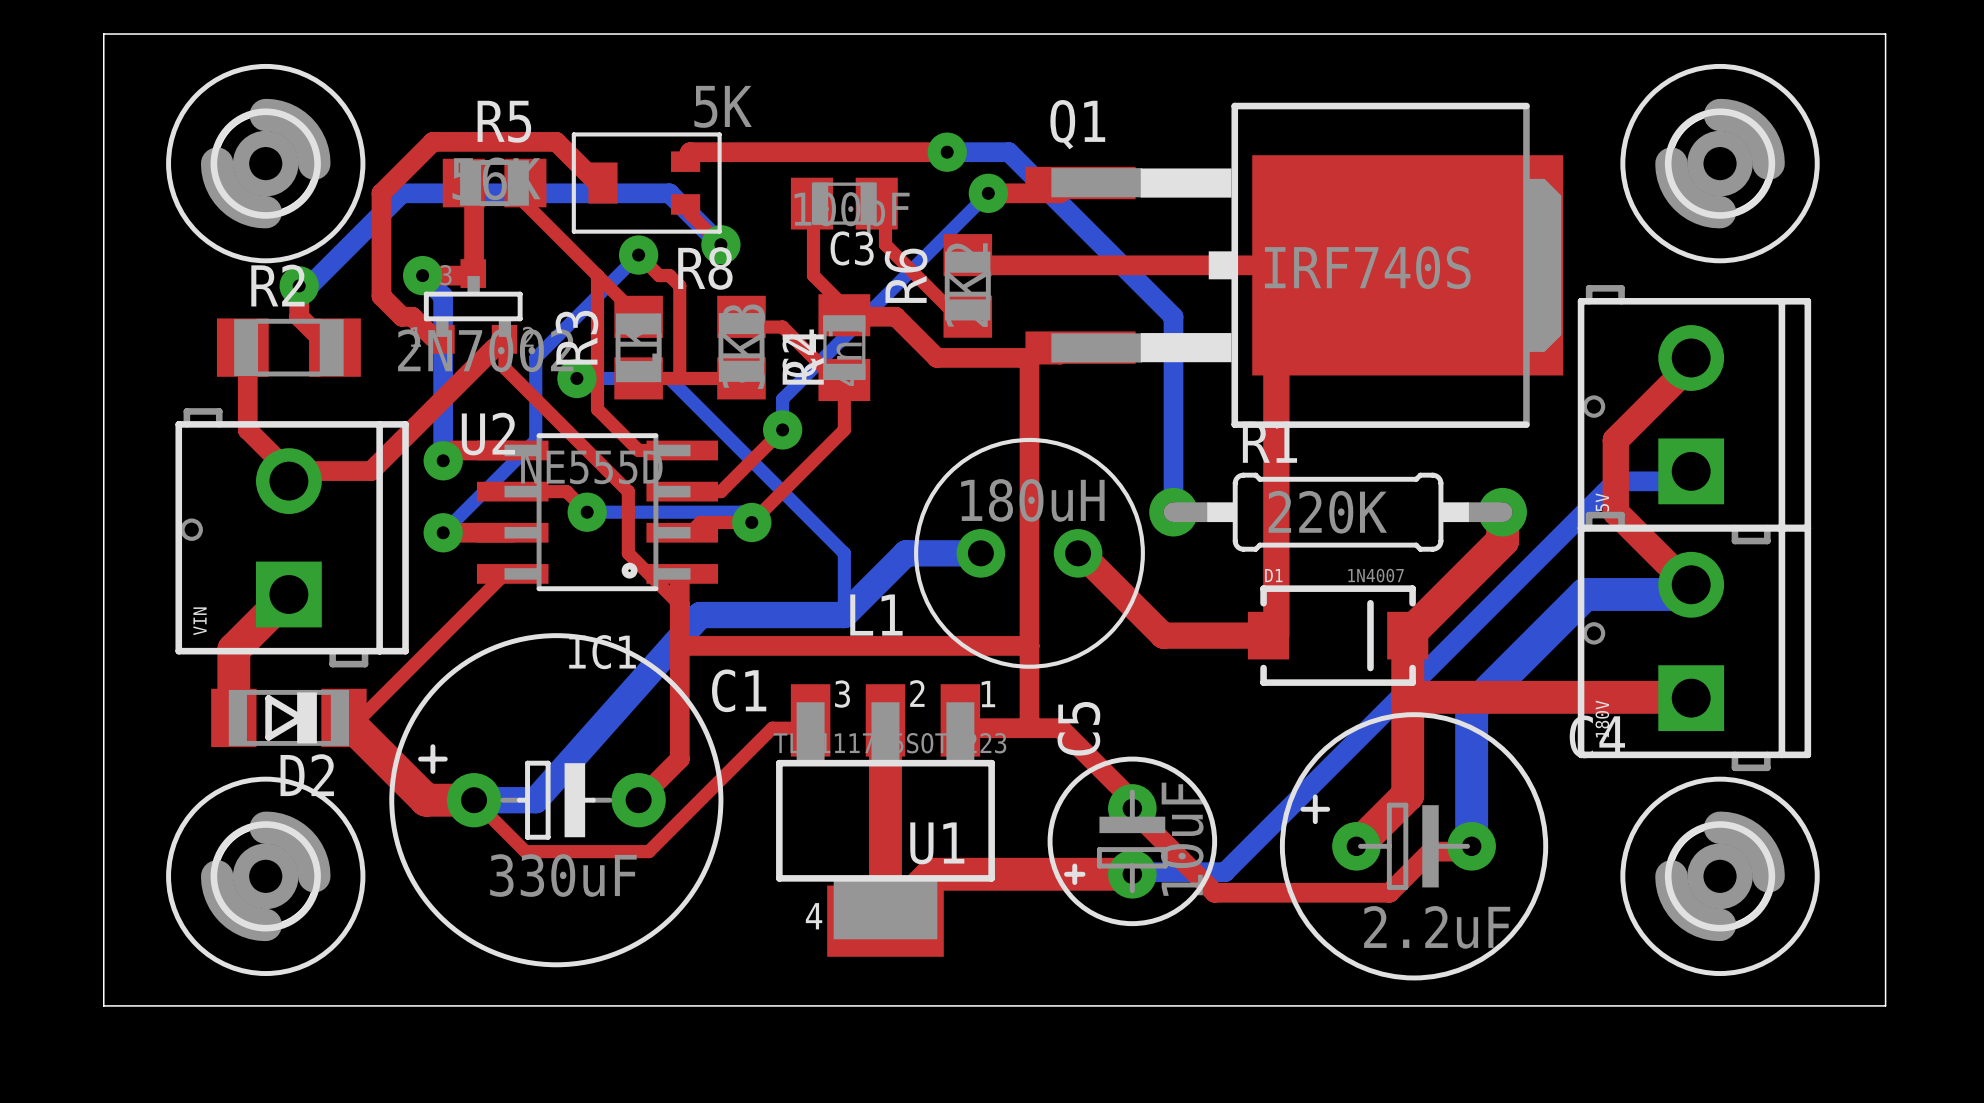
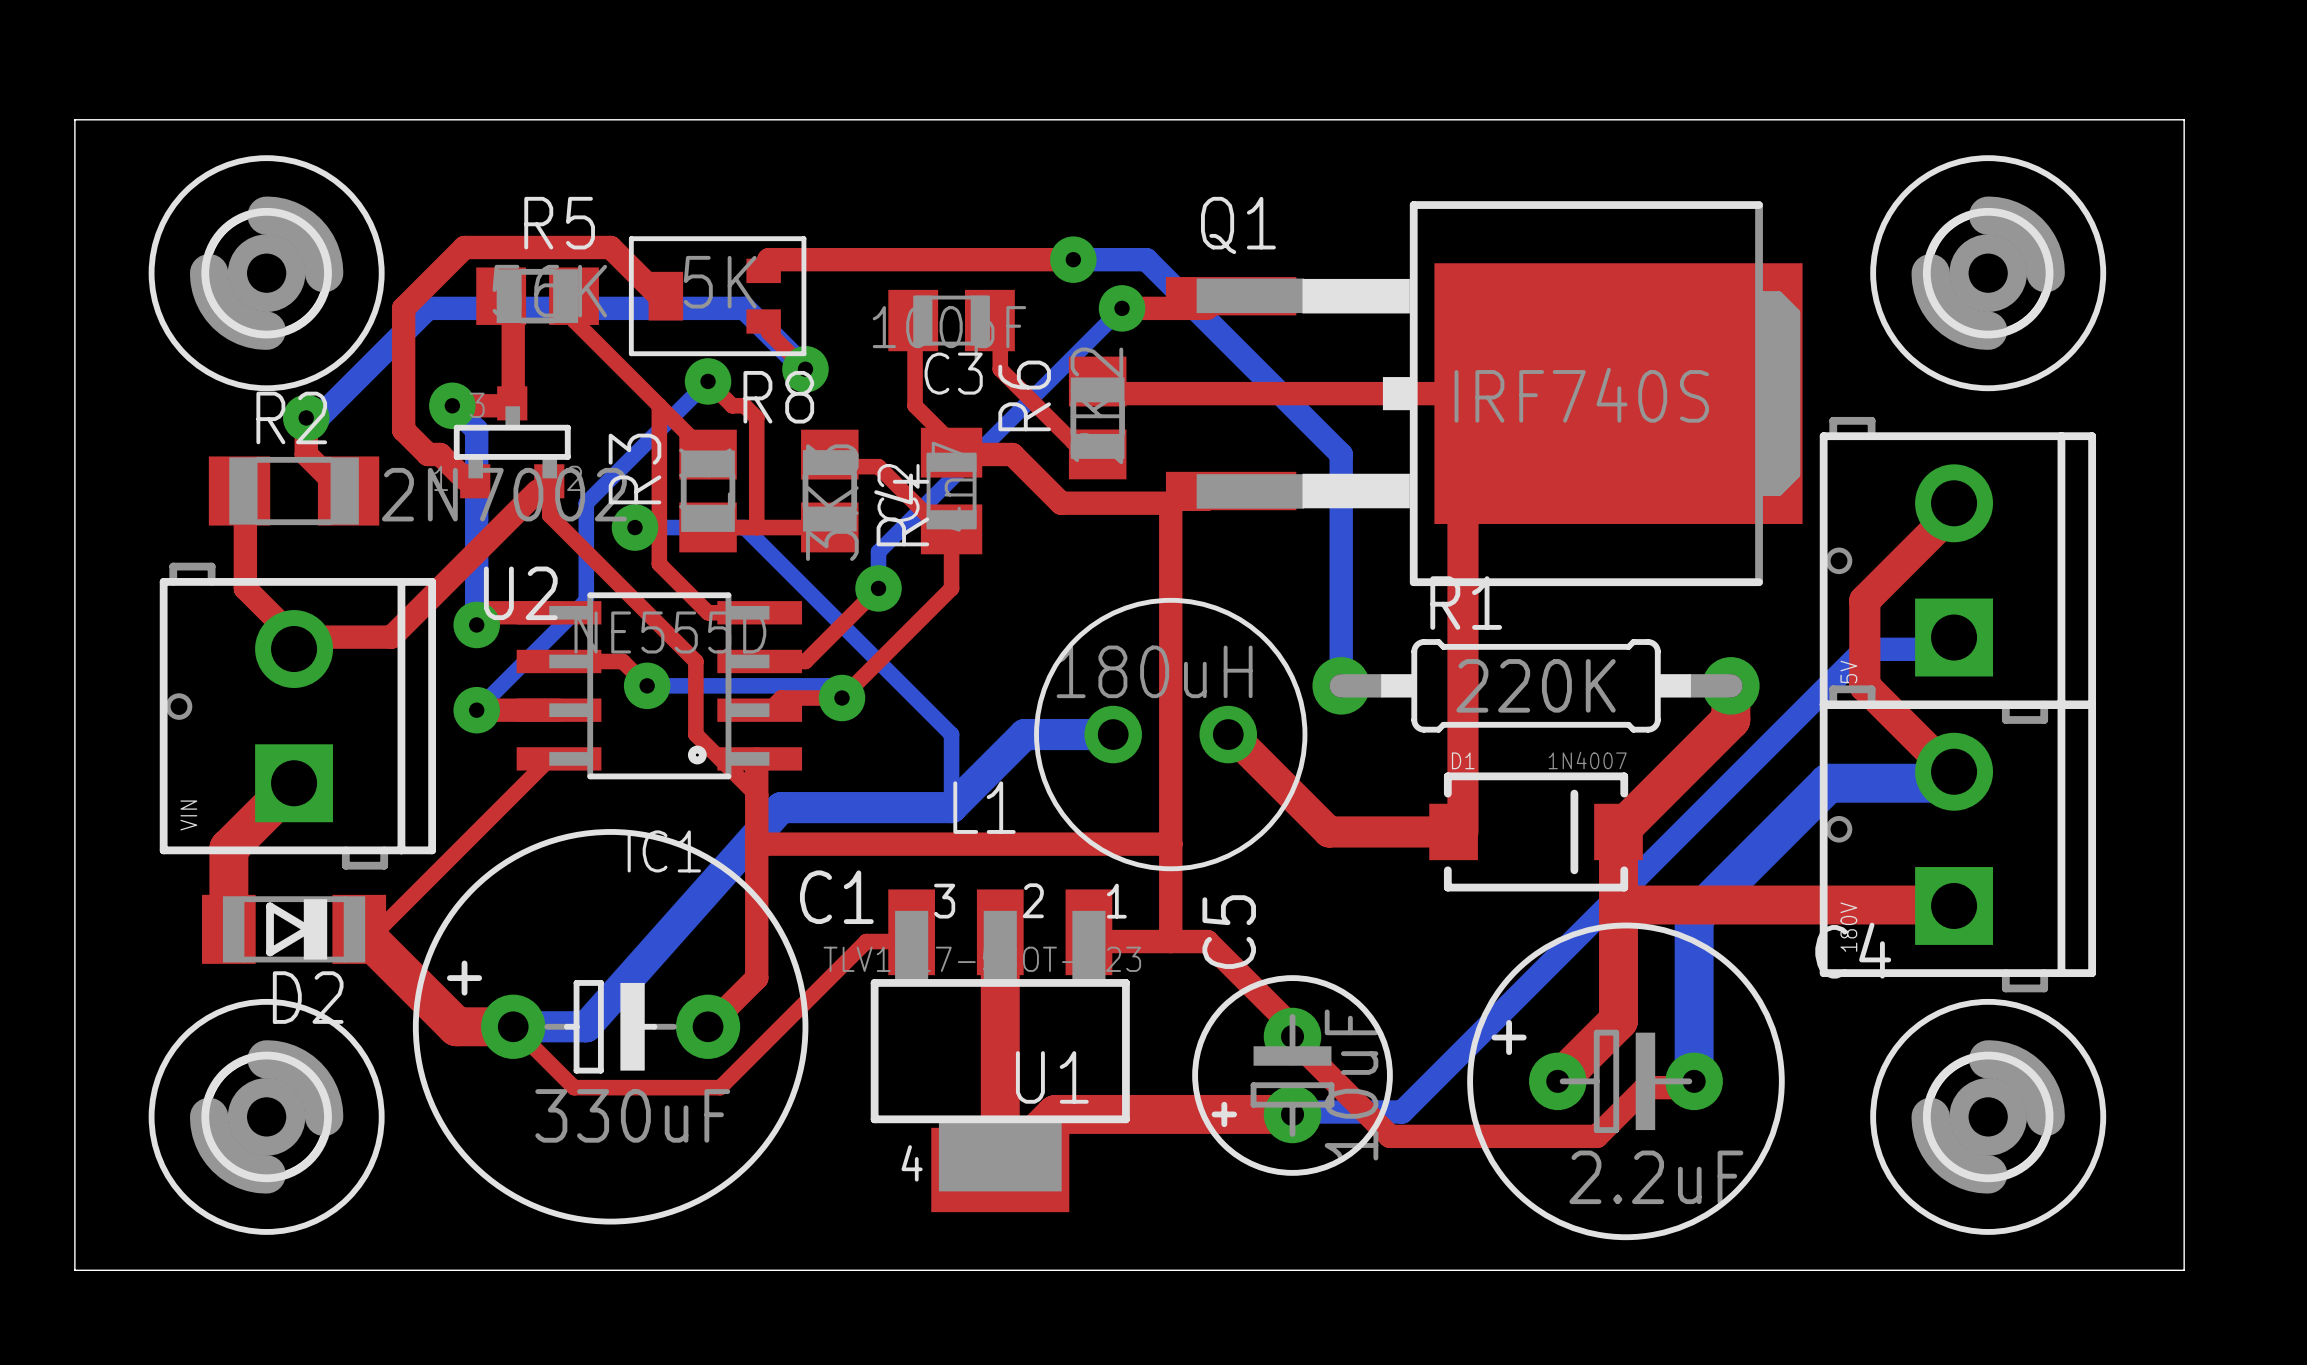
R8 value position: 5K (723, 106) -> 5K (720, 282)

